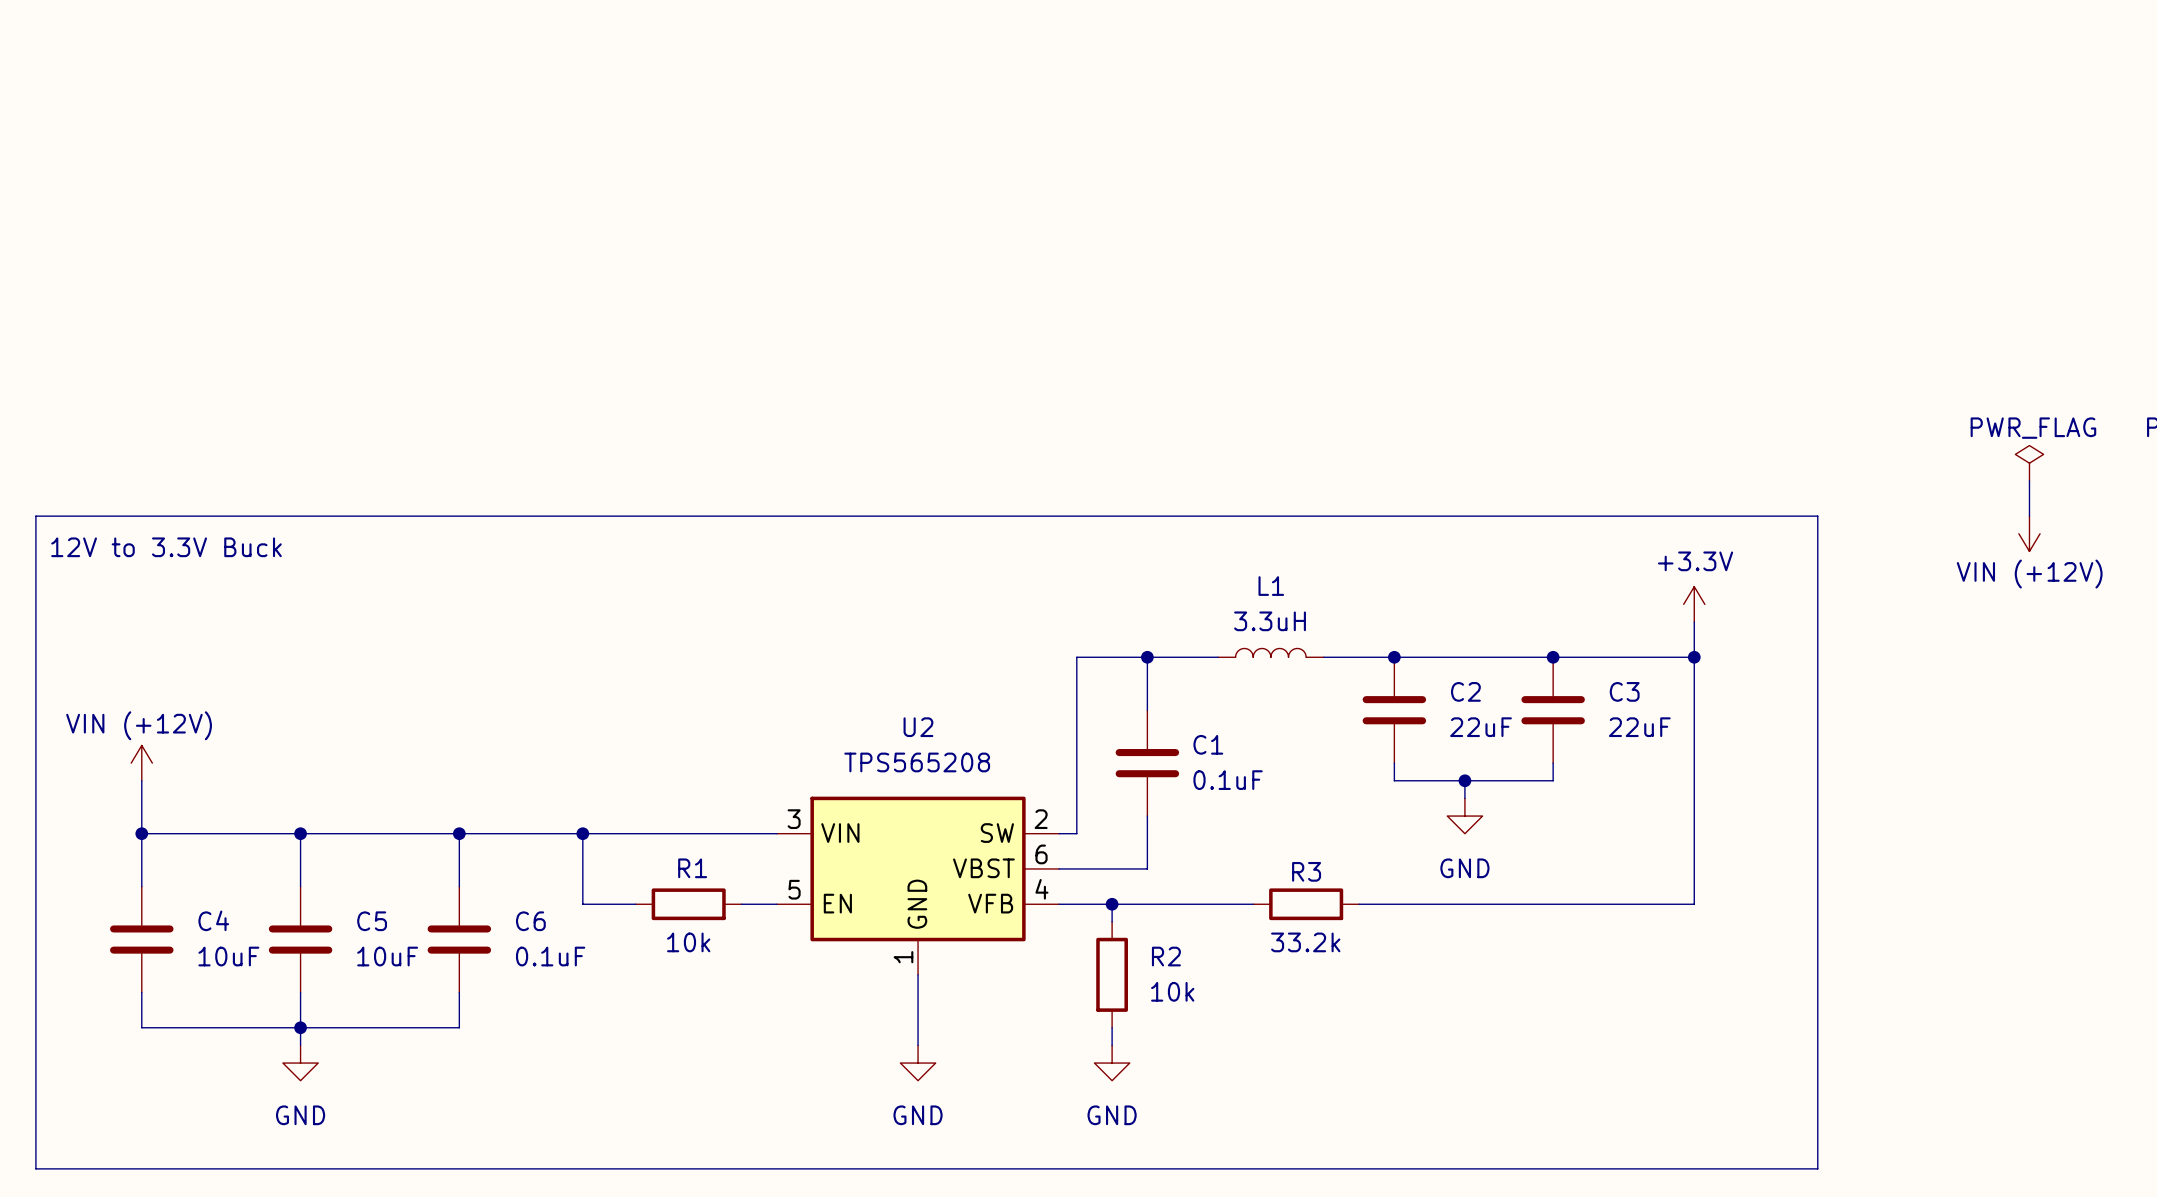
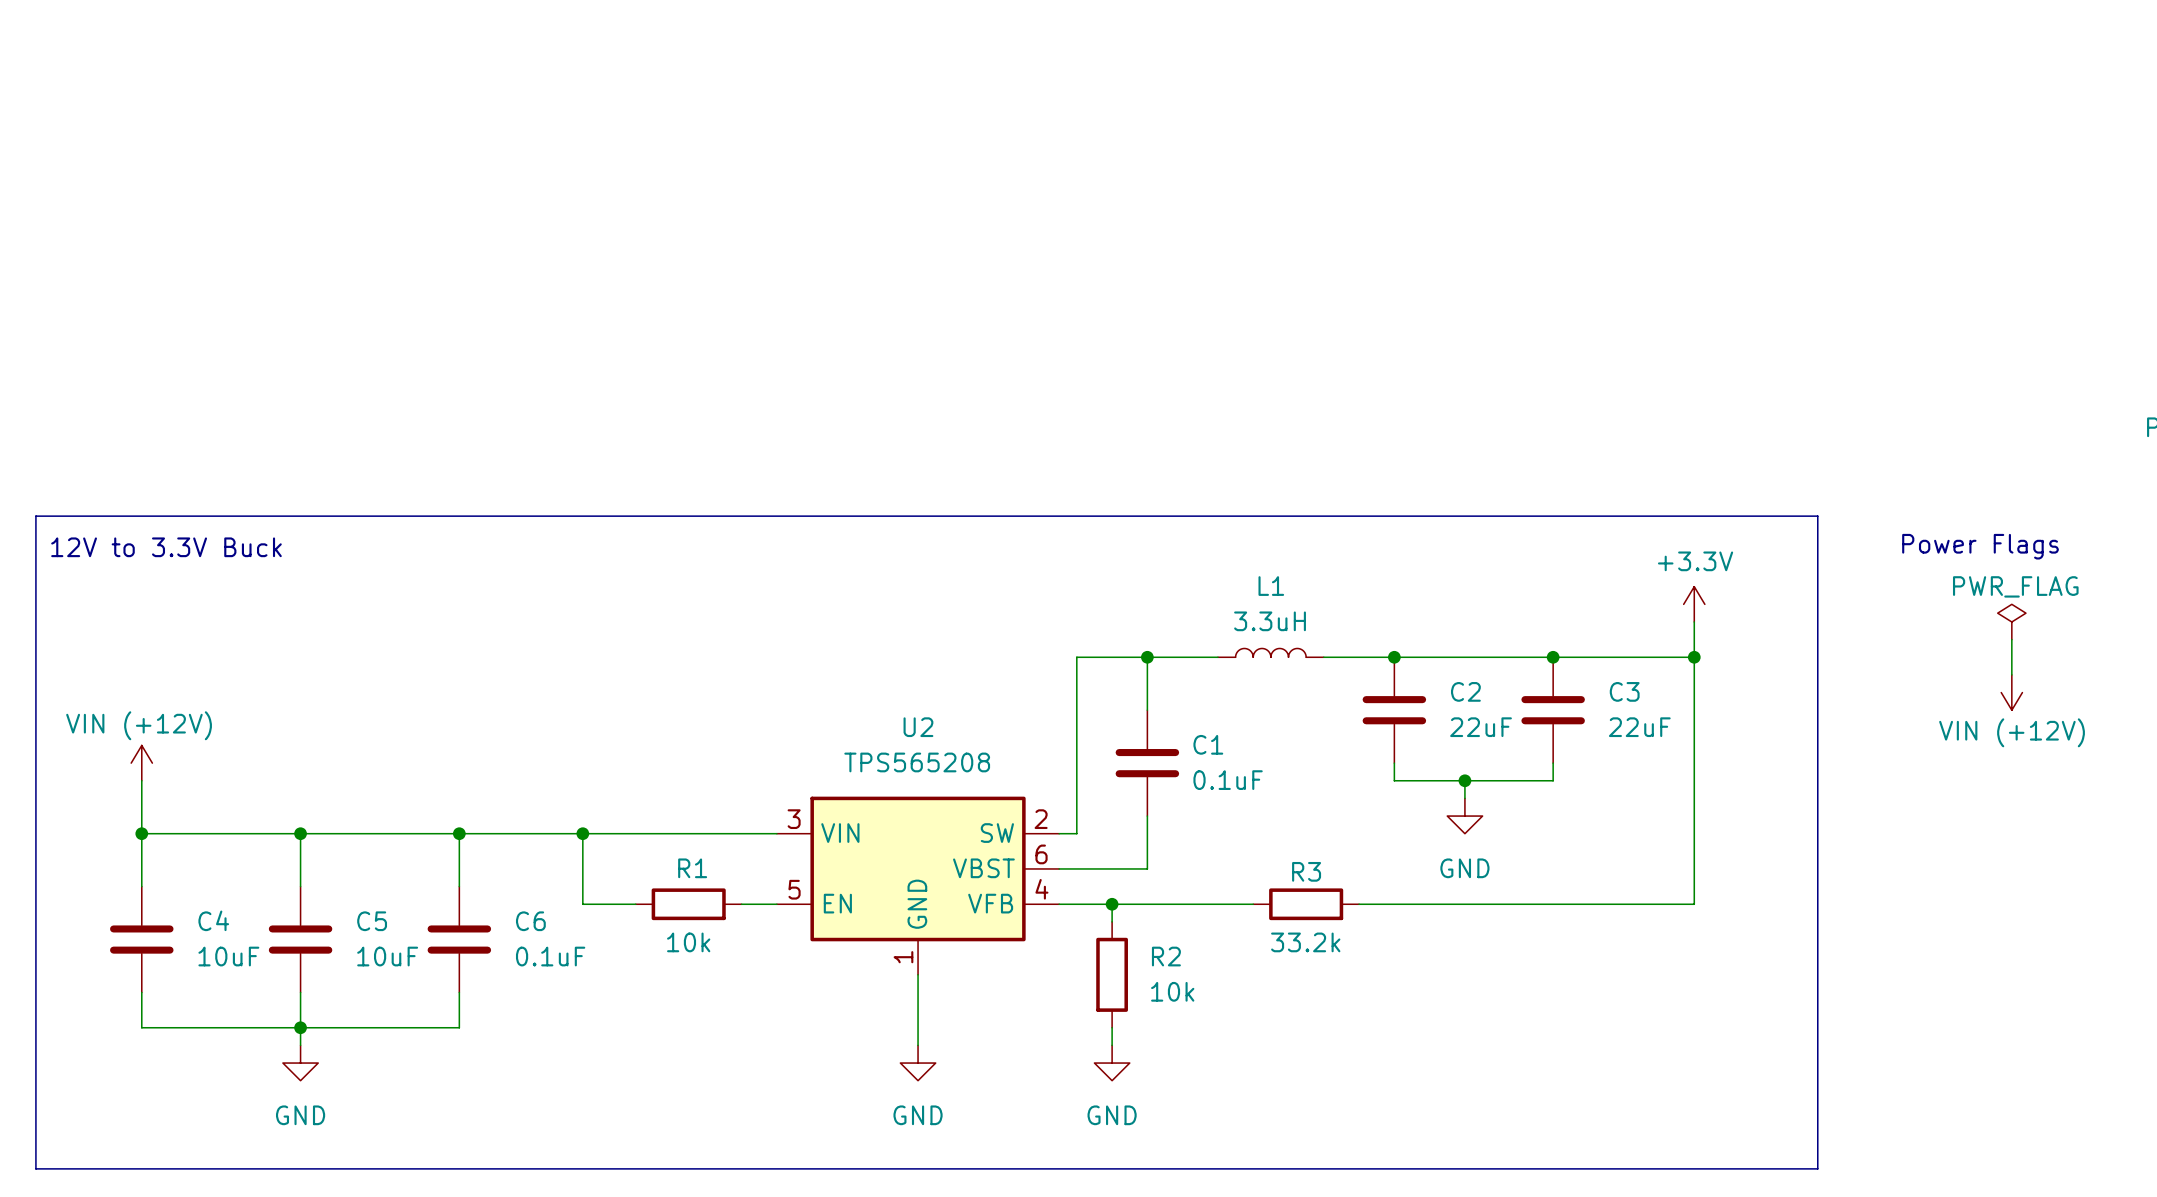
power symbol position: PWR_FLAG (2029, 463) -> PWR_FLAG (2011, 621)
wire: (2029, 480) (2029, 516) -> (2011, 639) (2011, 674)
power symbol position: VIN (+12V) (2029, 533) -> VIN (+12V) (2011, 692)
text: none -> Power Flags (1980, 546)

